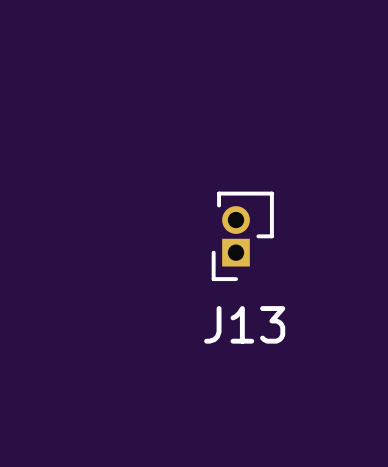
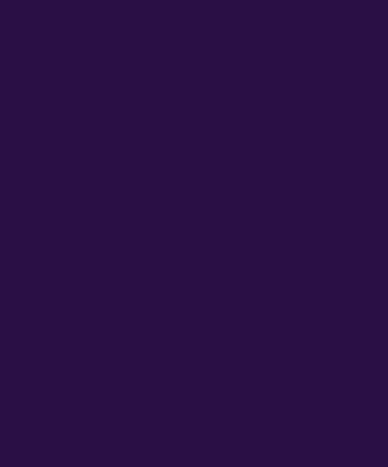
J13: (242, 236) -> none

